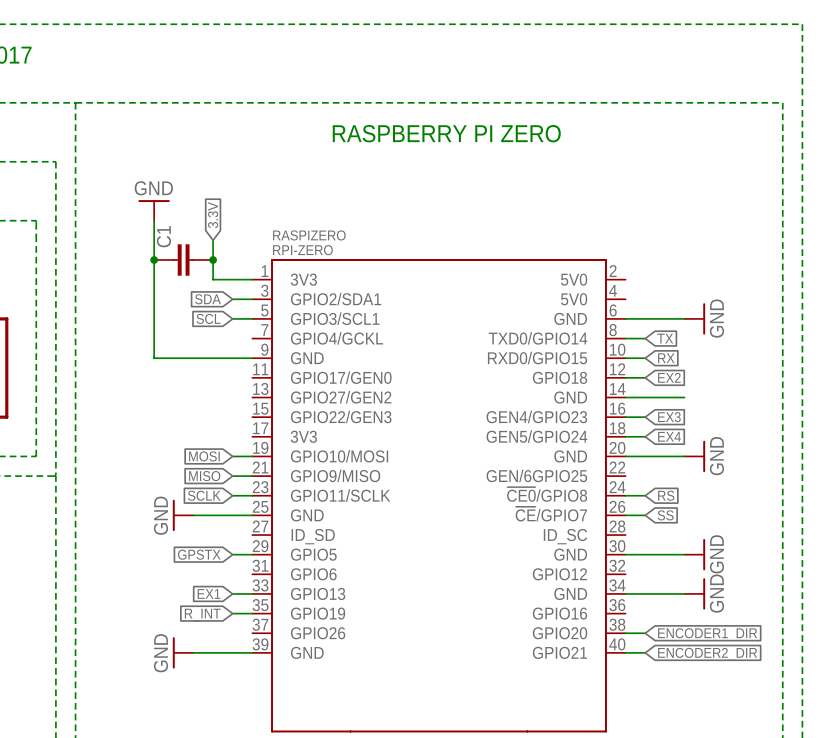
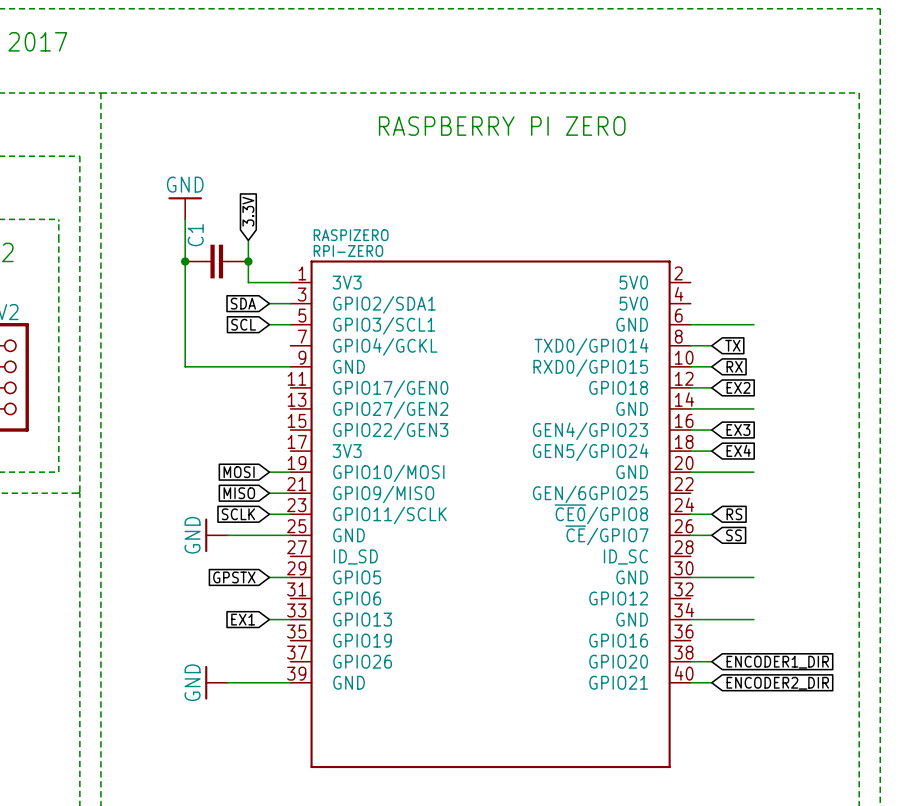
power symbol: GND (694, 318) -> none
power symbol: GND (694, 456) -> none
power symbol: GND (694, 554) -> none
power symbol: GND (694, 593) -> none
wire: (232, 613) (252, 613) -> none
global label: R_INT (202, 615) -> none

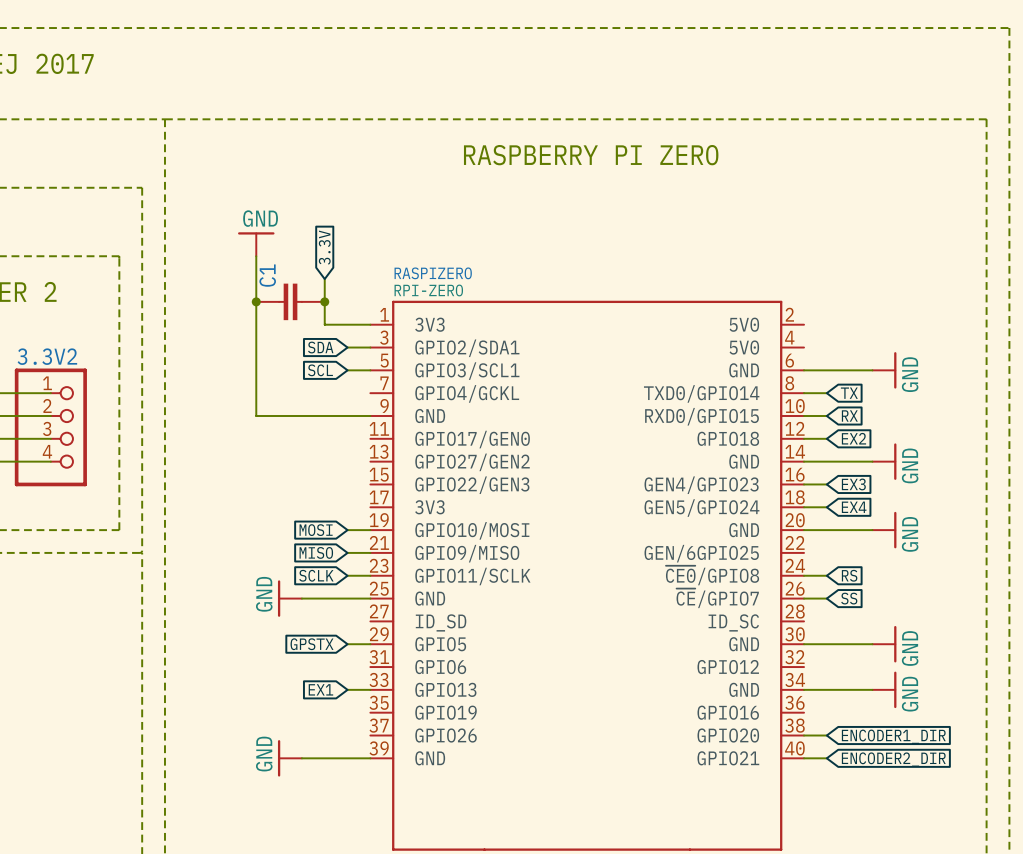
power symbol: none -> GND (884, 370)
power symbol: none -> GND (884, 461)
power symbol: none -> GND (884, 530)
power symbol: none -> GND (884, 644)
power symbol: none -> GND (884, 689)

